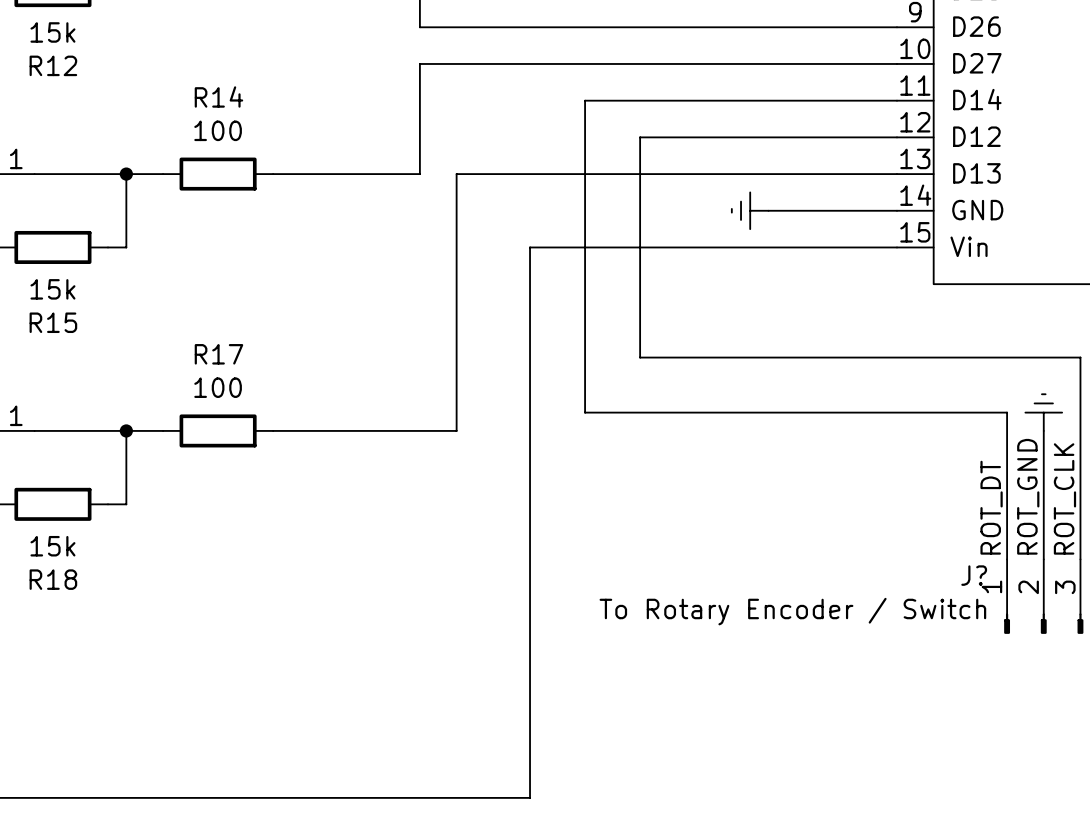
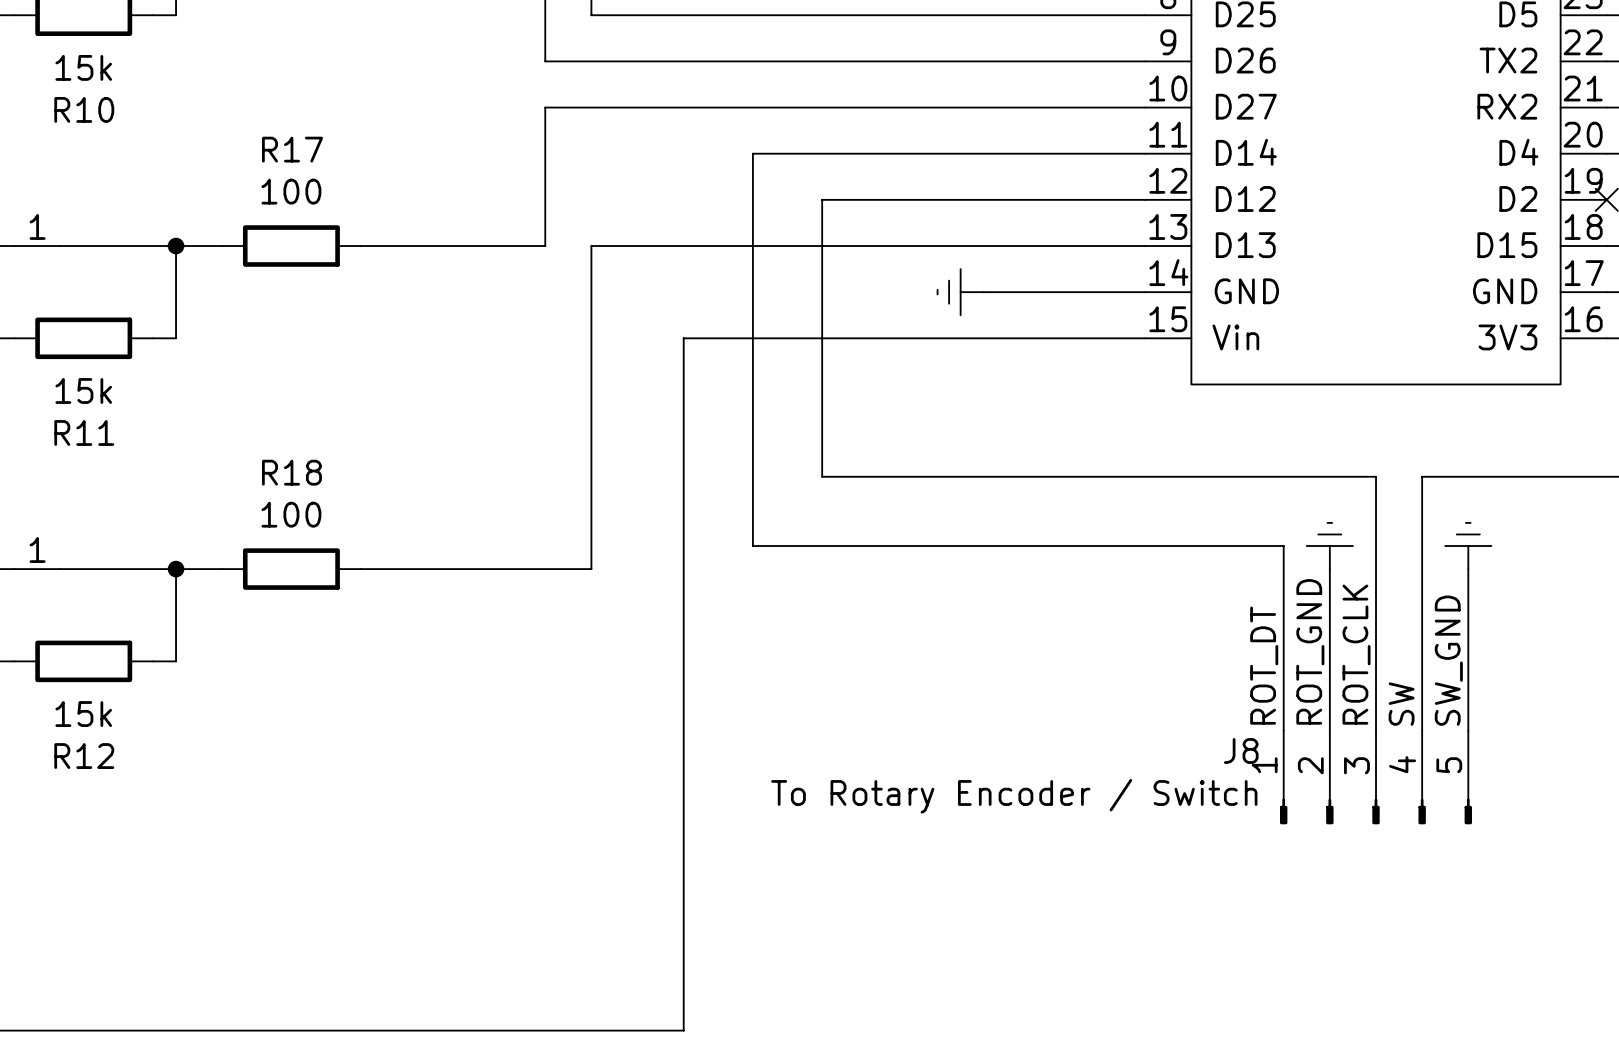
R12 name: R12 (53, 65) -> R10 (84, 109)
R14 name: R14 (218, 96) -> R17 (292, 149)
R15 name: R15 (53, 322) -> R11 (84, 432)
R17 name: R17 (218, 354) -> R18 (291, 472)
J? name: J? (974, 575) -> J8 (1241, 750)
R18 name: R18 (53, 579) -> R12 (84, 756)

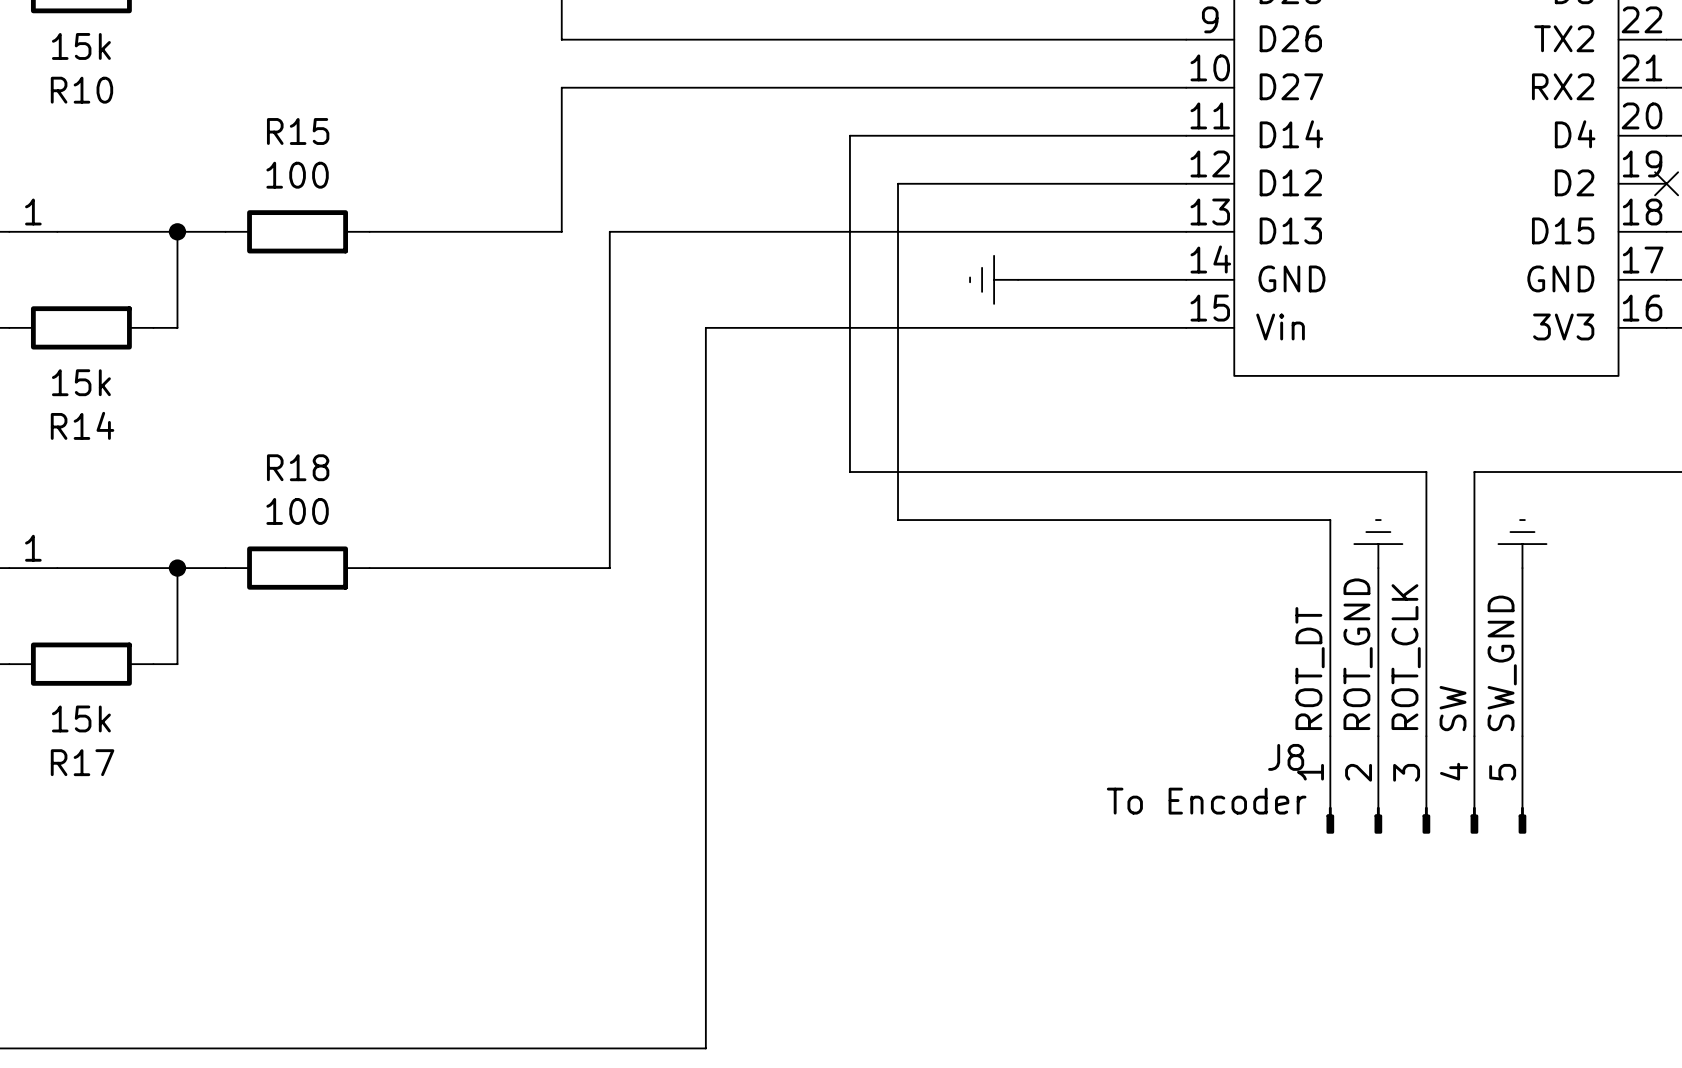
R17 name: R17 (292, 149) -> R15 (298, 131)
wire: (822, 153) (752, 153) (752, 546) (1283, 546) -> (898, 183) (898, 520) (1330, 520) (1330, 544)
wire: (822, 199) (868, 199) -> (849, 183) (849, 135)
R11 name: R11 (84, 432) -> R14 (82, 425)
R12 name: R12 (84, 756) -> R17 (82, 762)
J8 value: To Rotary Encoder / Switch (1014, 796) -> To Encoder (1206, 801)

